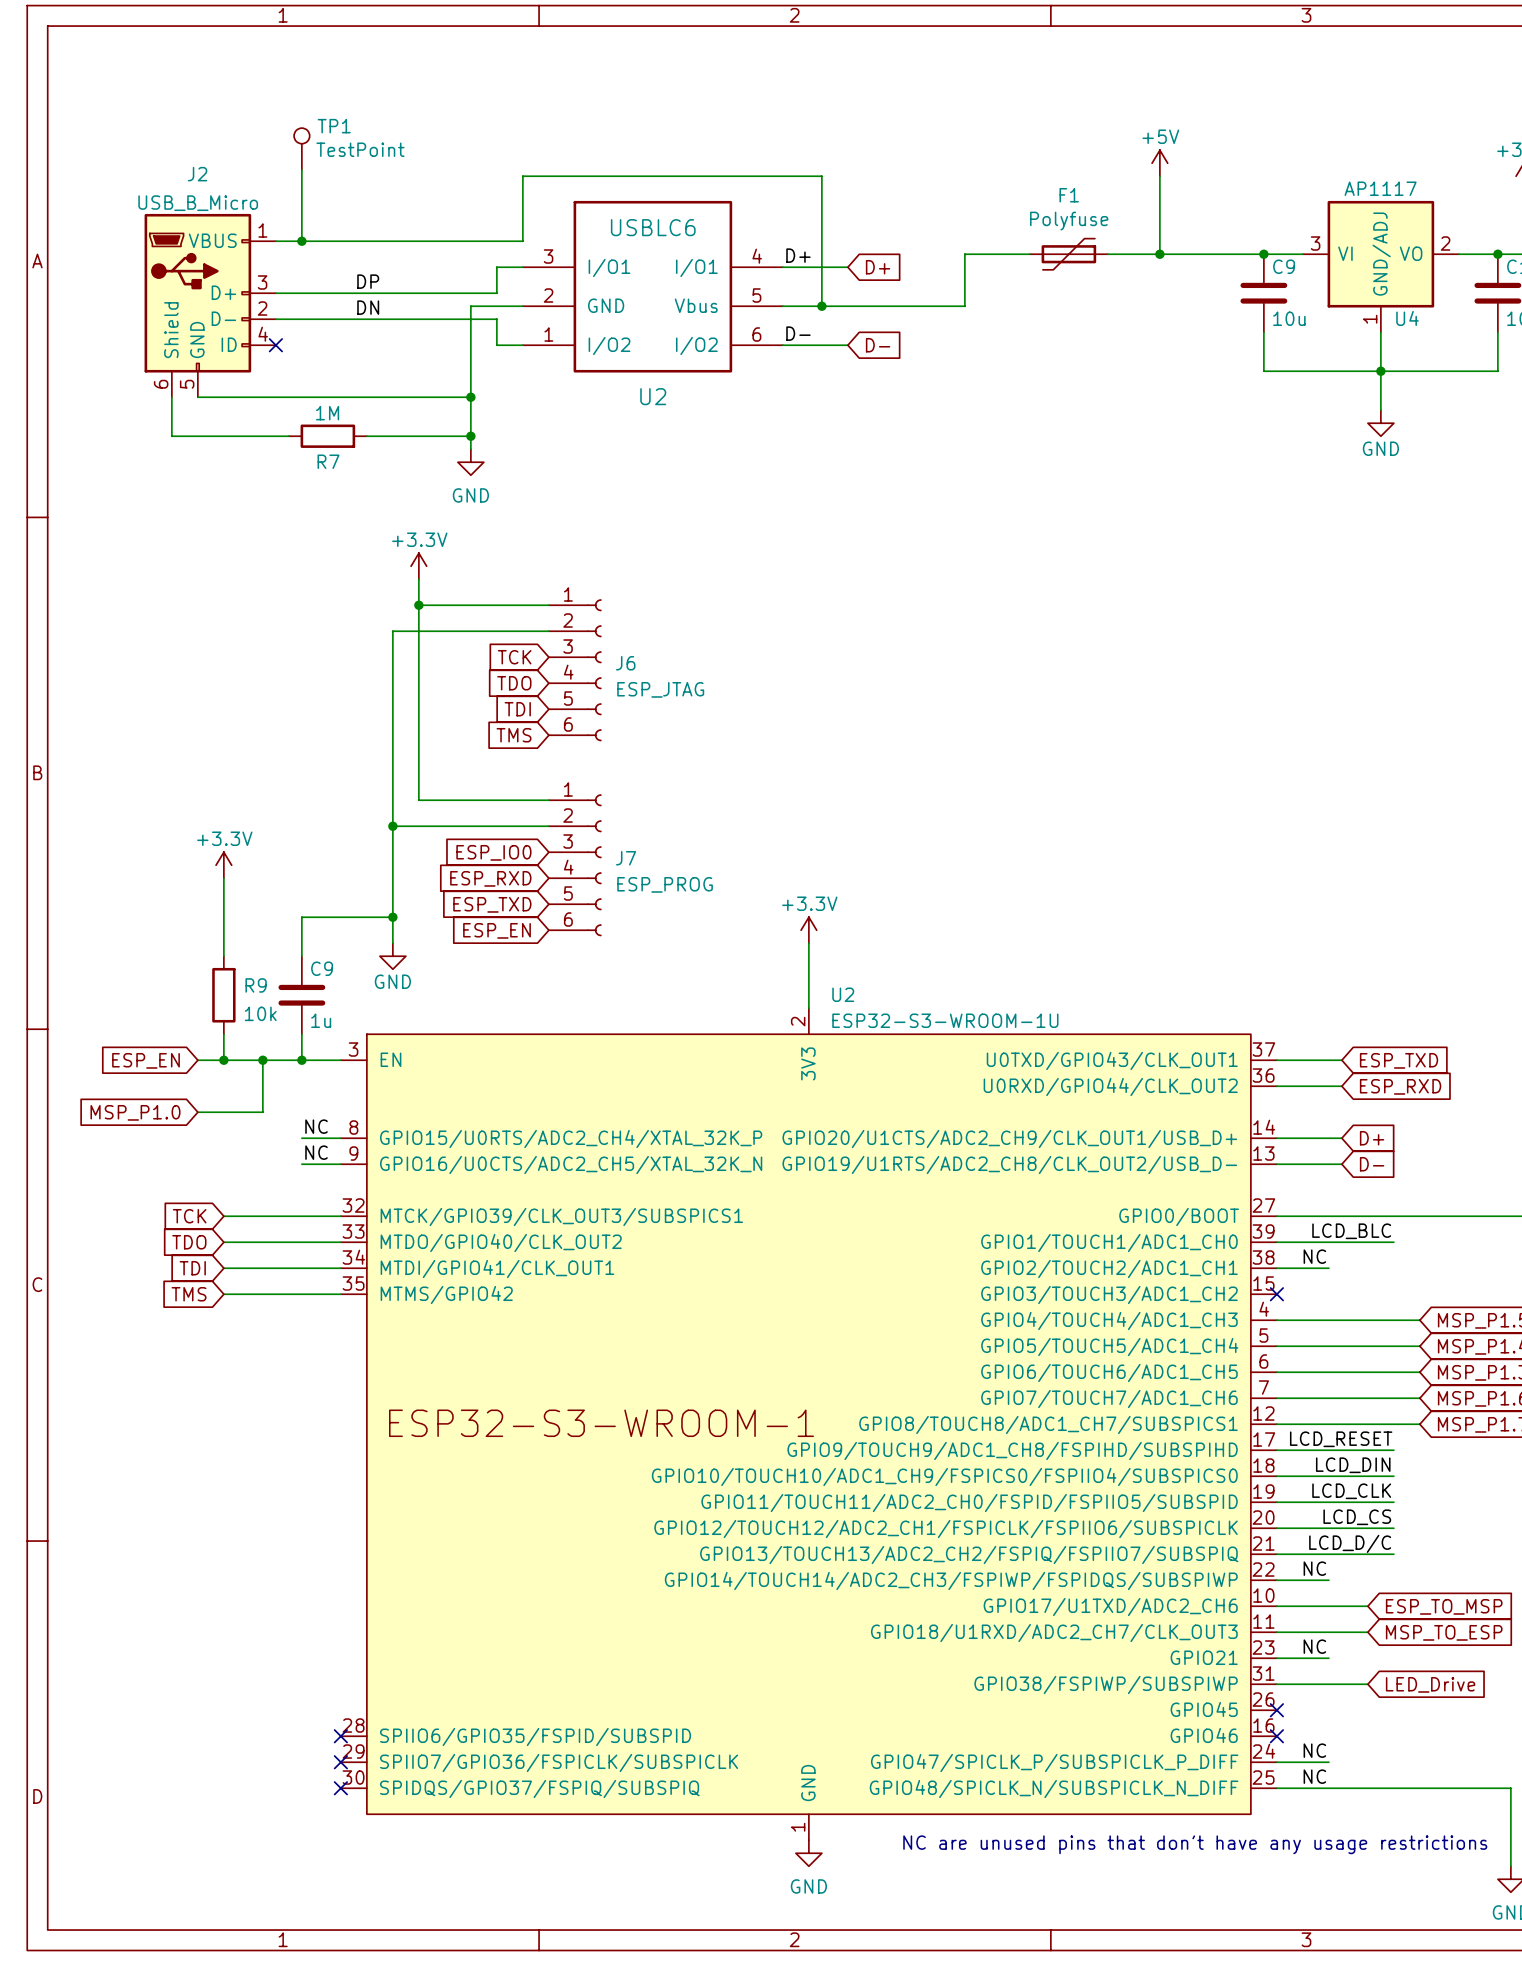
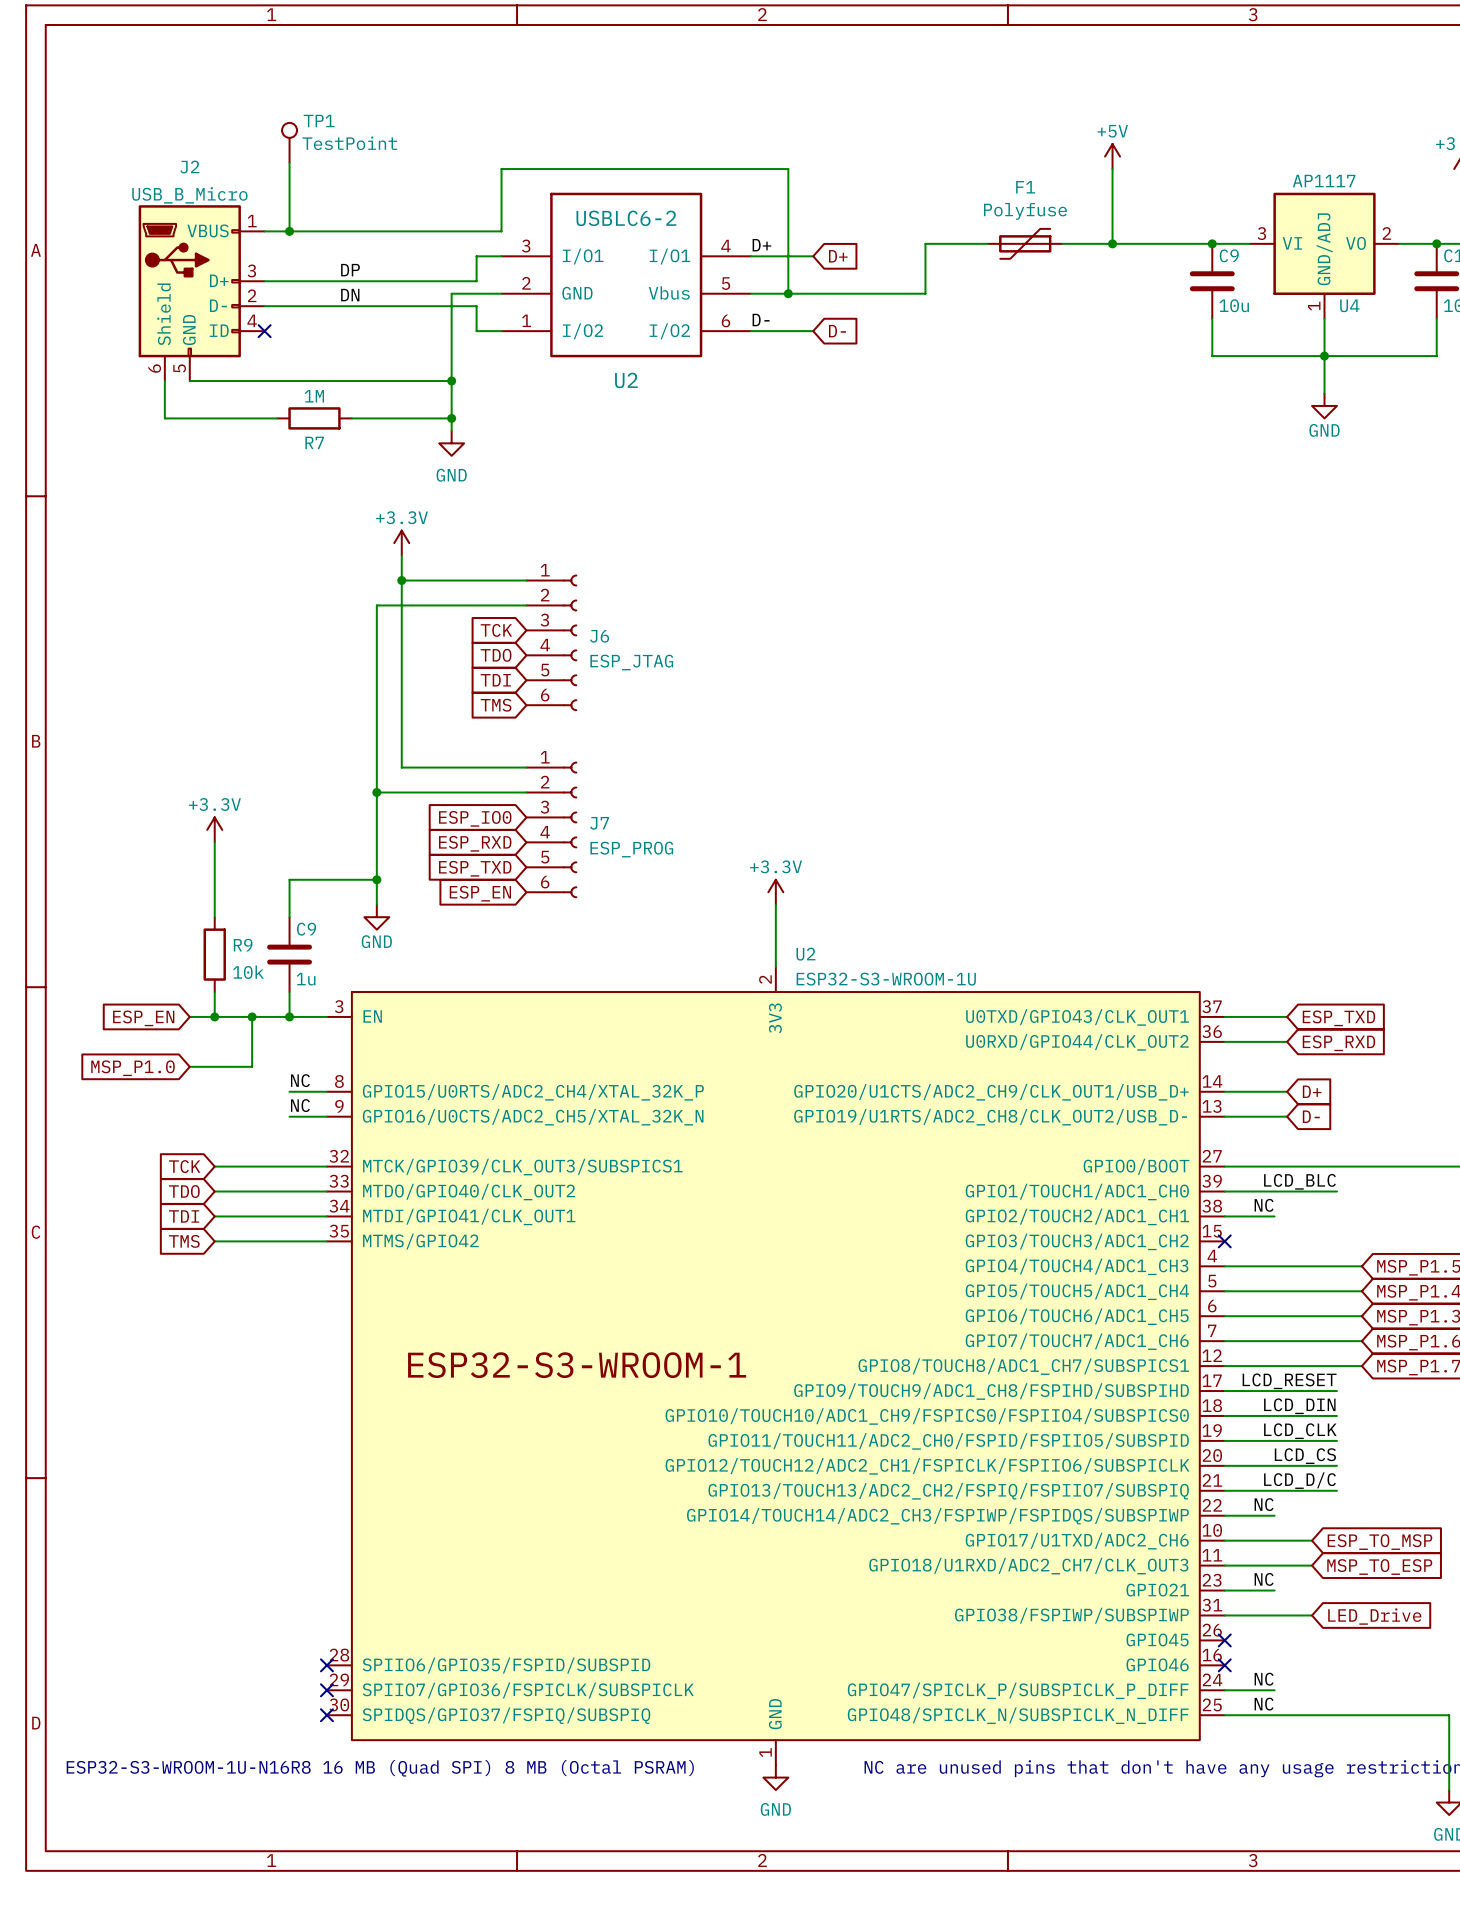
U2 value: USBLC6 (653, 227) -> USBLC6-2 (626, 218)
text: none -> ESP32-S3-WROOM-1U-N16R8 16 MB (Quad SPI) 8 MB (Octal PSRAM) (380, 1768)

